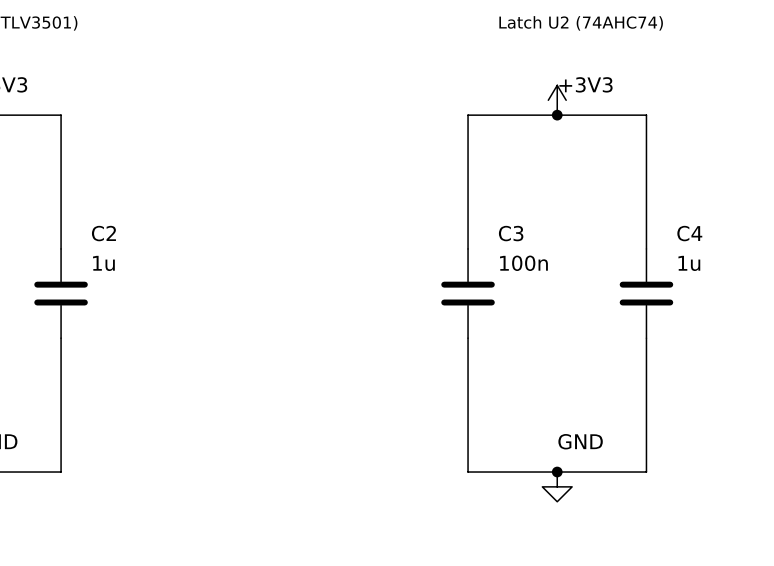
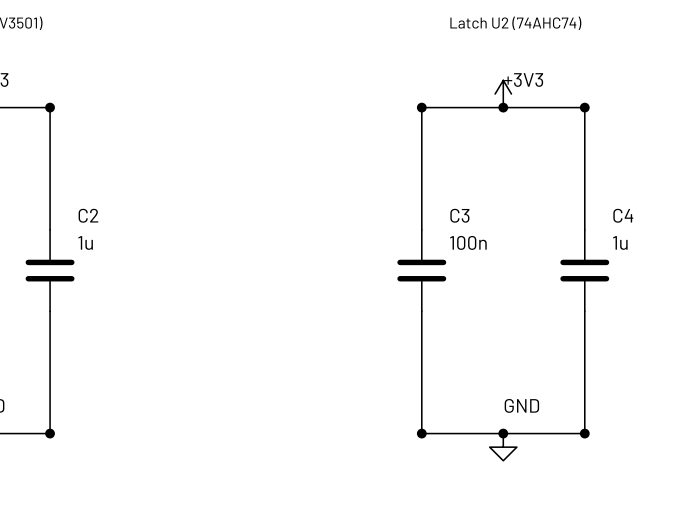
junction: none -> (50, 107)
junction: none -> (421, 107)
junction: none -> (584, 107)
junction: none -> (50, 433)
junction: none -> (421, 433)
junction: none -> (584, 433)

